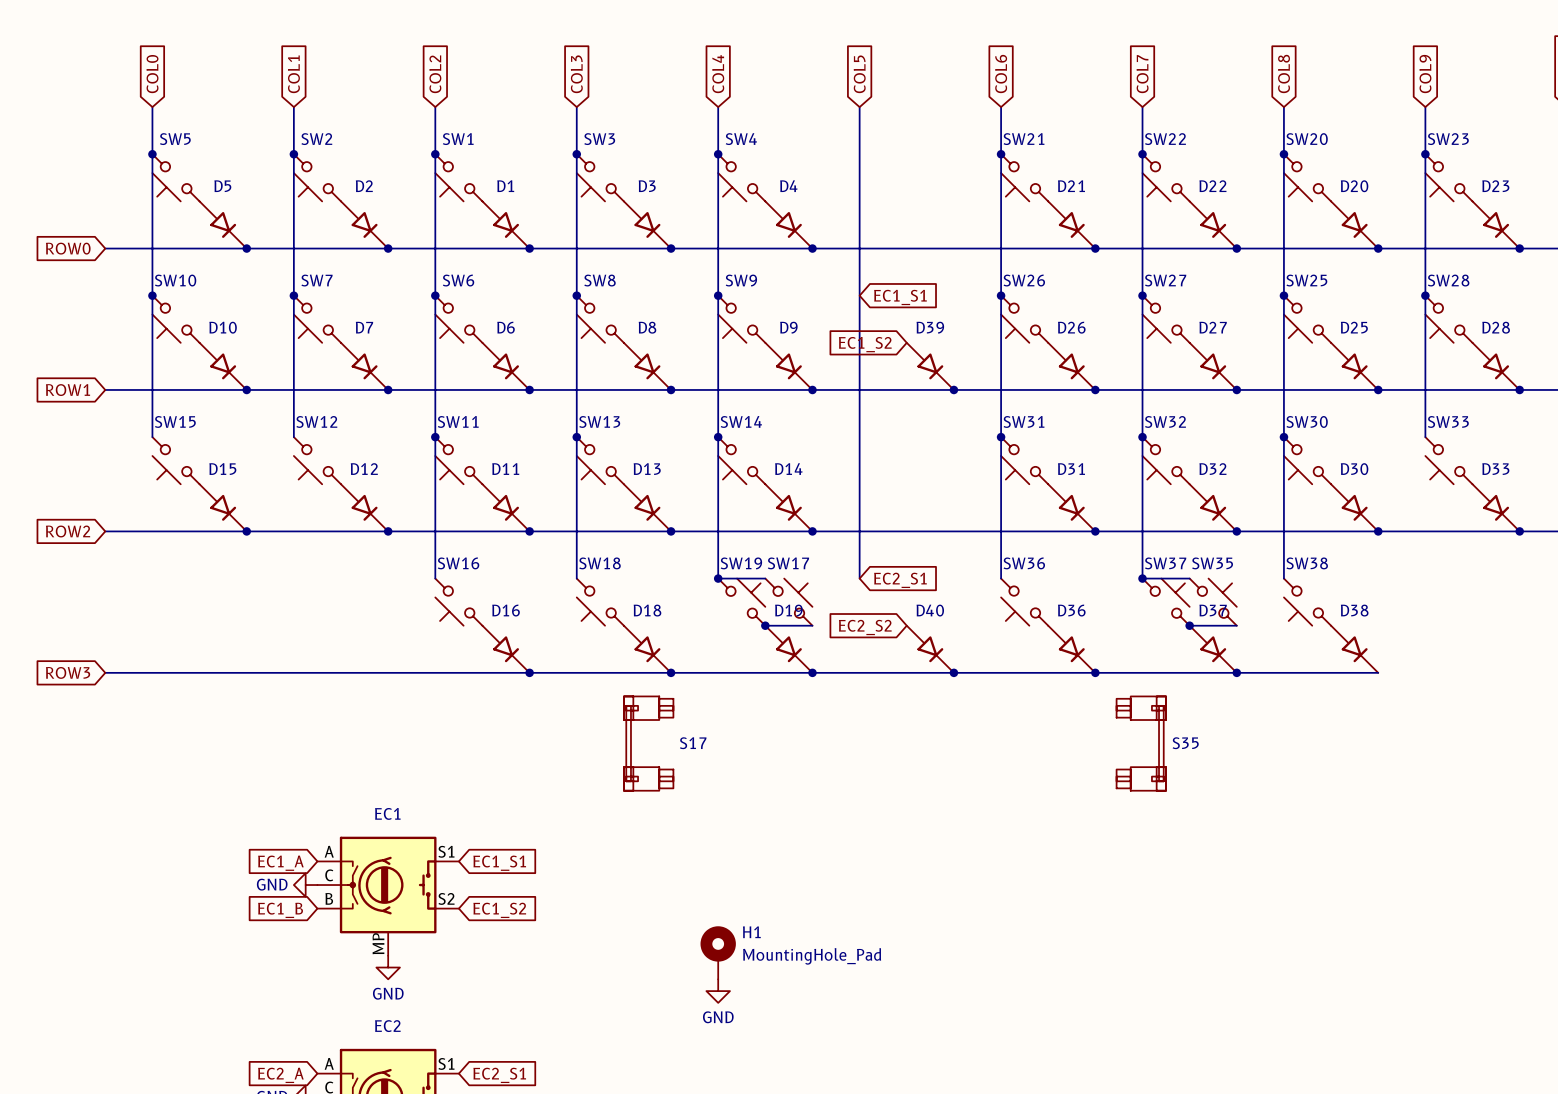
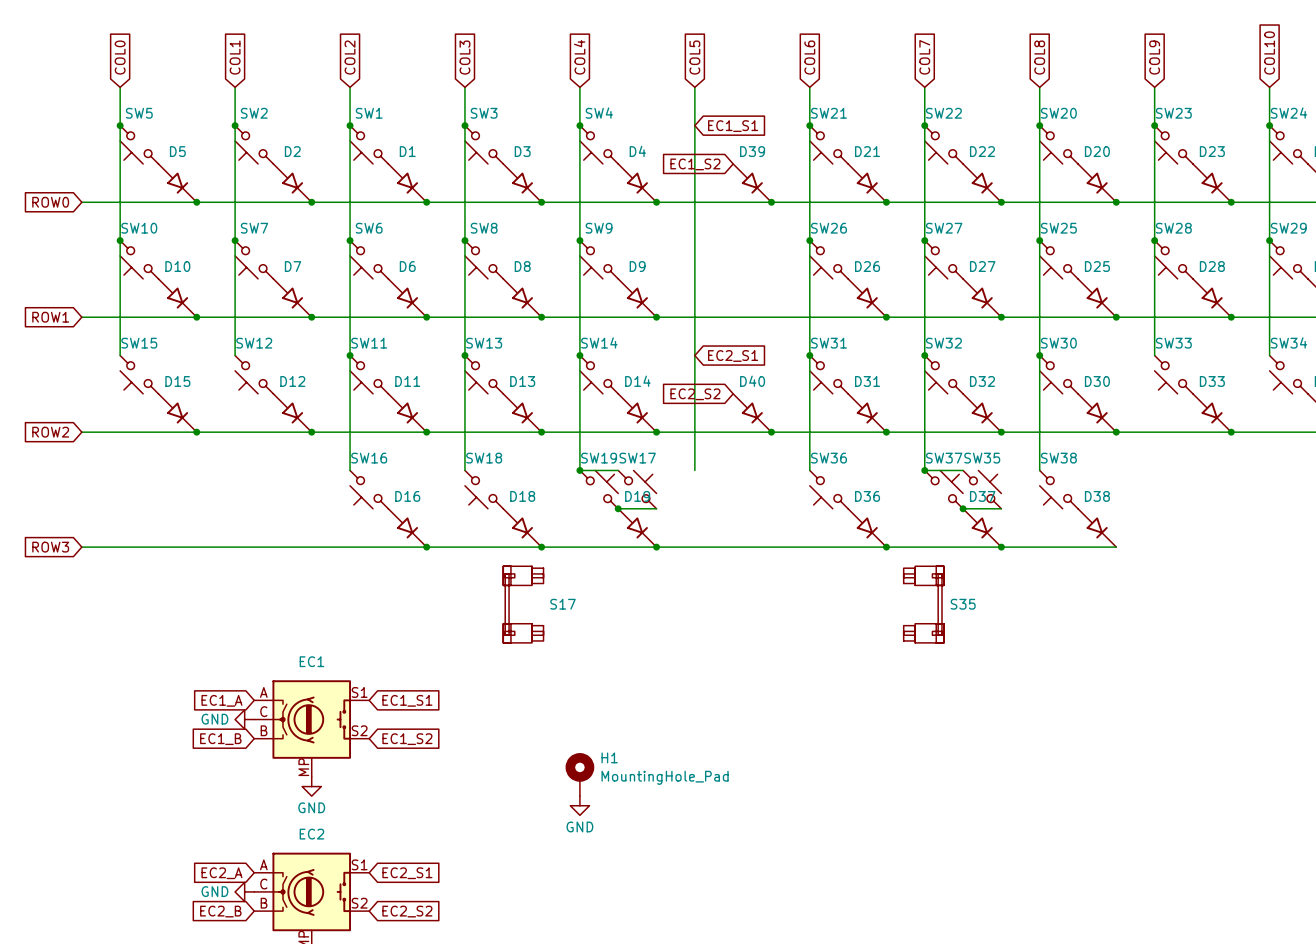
junction: none -> (771, 202)
global label position: EC1_S1 (900, 297) -> EC1_S1 (733, 126)
global label position: EC1_S2 (865, 344) -> EC1_S2 (695, 164)
D39 position: (930, 366) -> (752, 183)
junction: (953, 389) -> none
junction: none -> (771, 432)
global label position: EC2_S1 (900, 580) -> EC2_S1 (733, 355)
global label position: EC2_S2 (865, 627) -> EC2_S2 (695, 394)
D40 position: (930, 649) -> (752, 413)
junction: (953, 672) -> none

